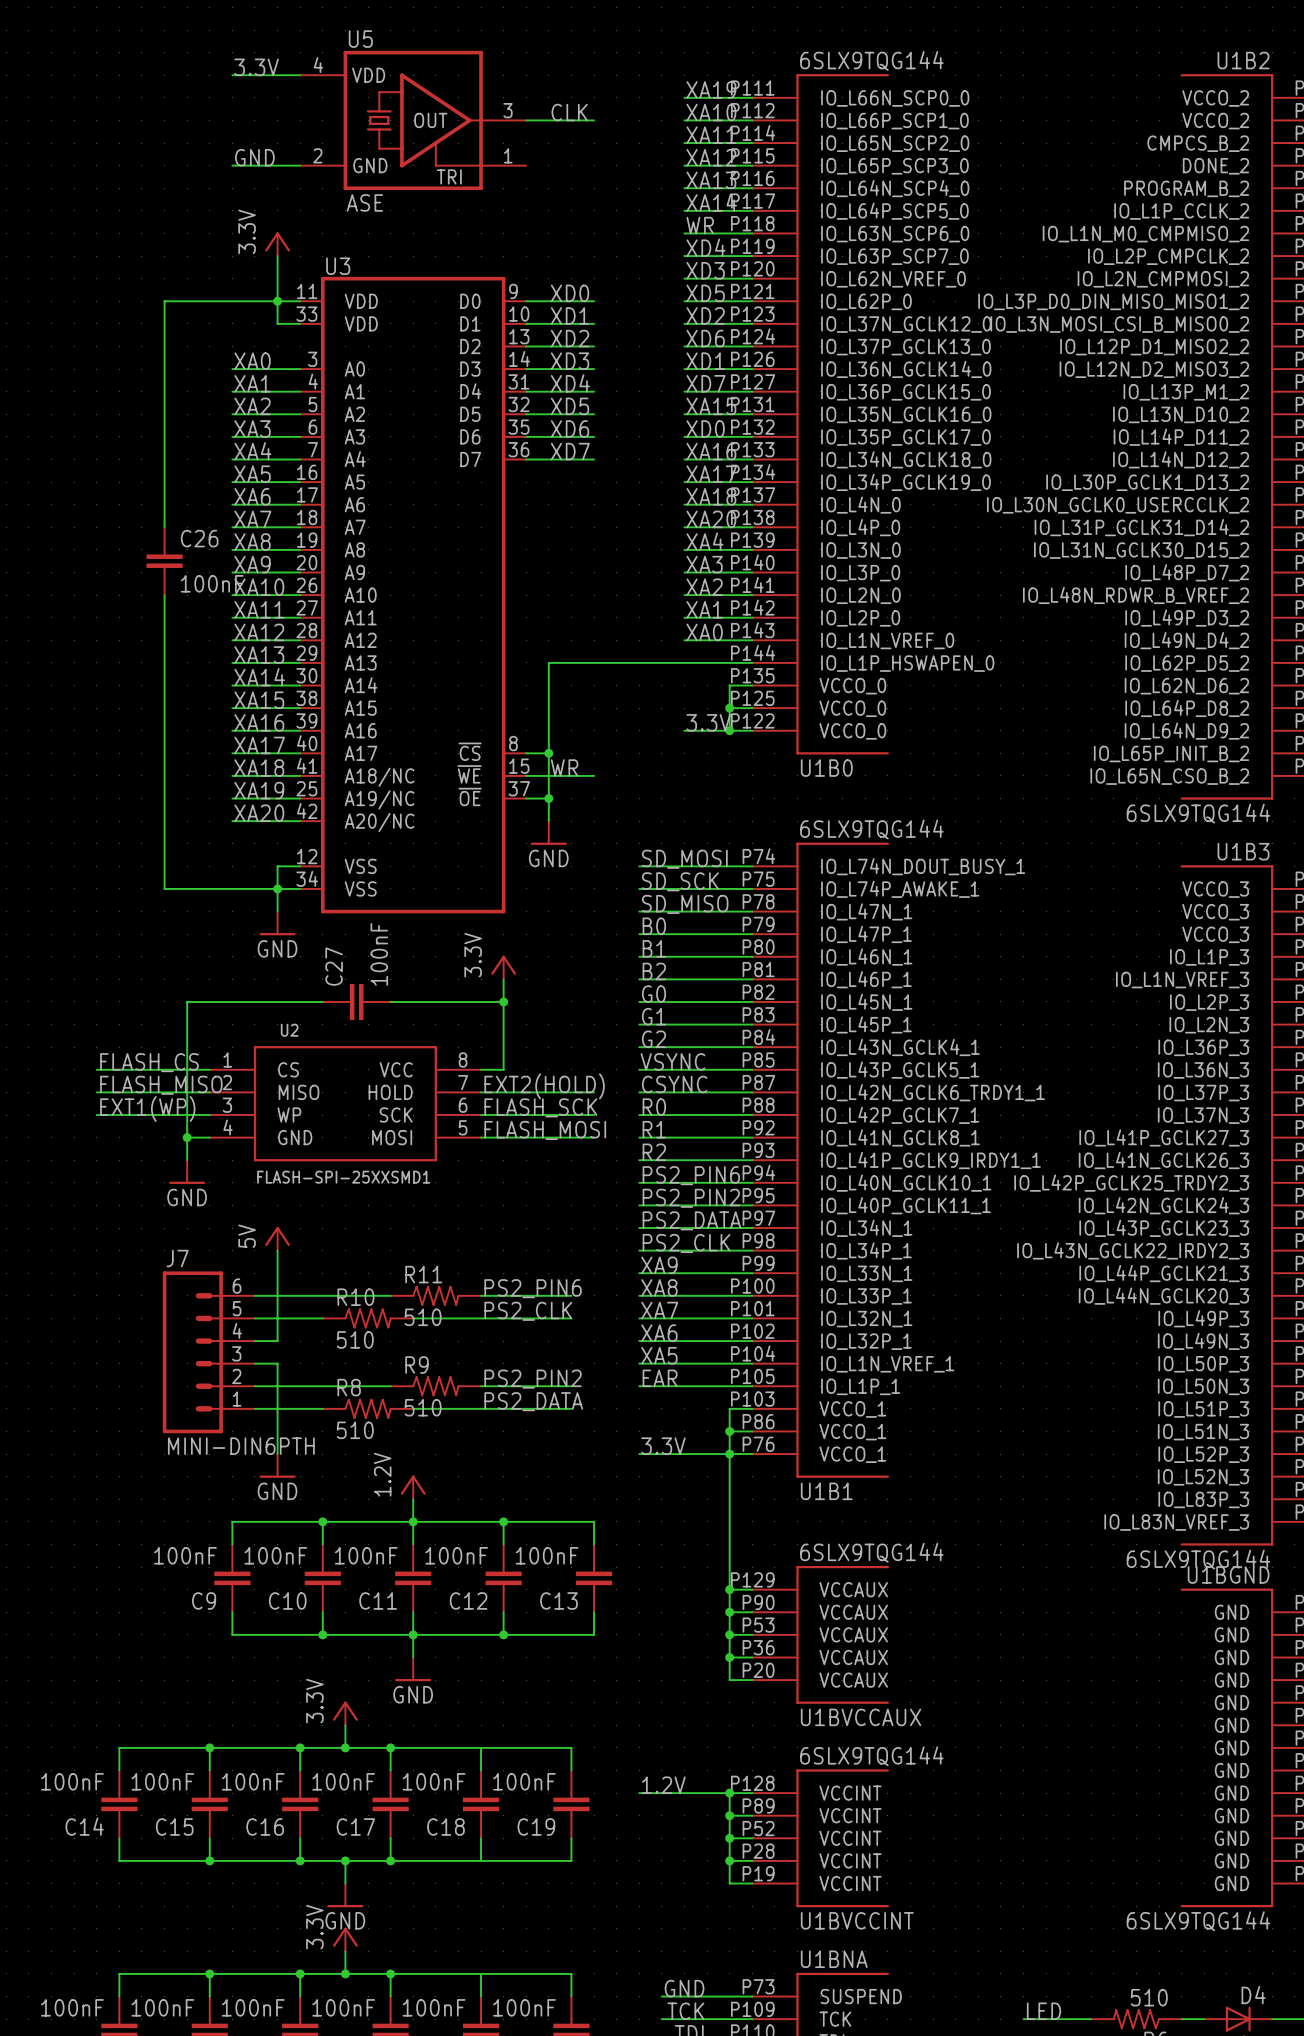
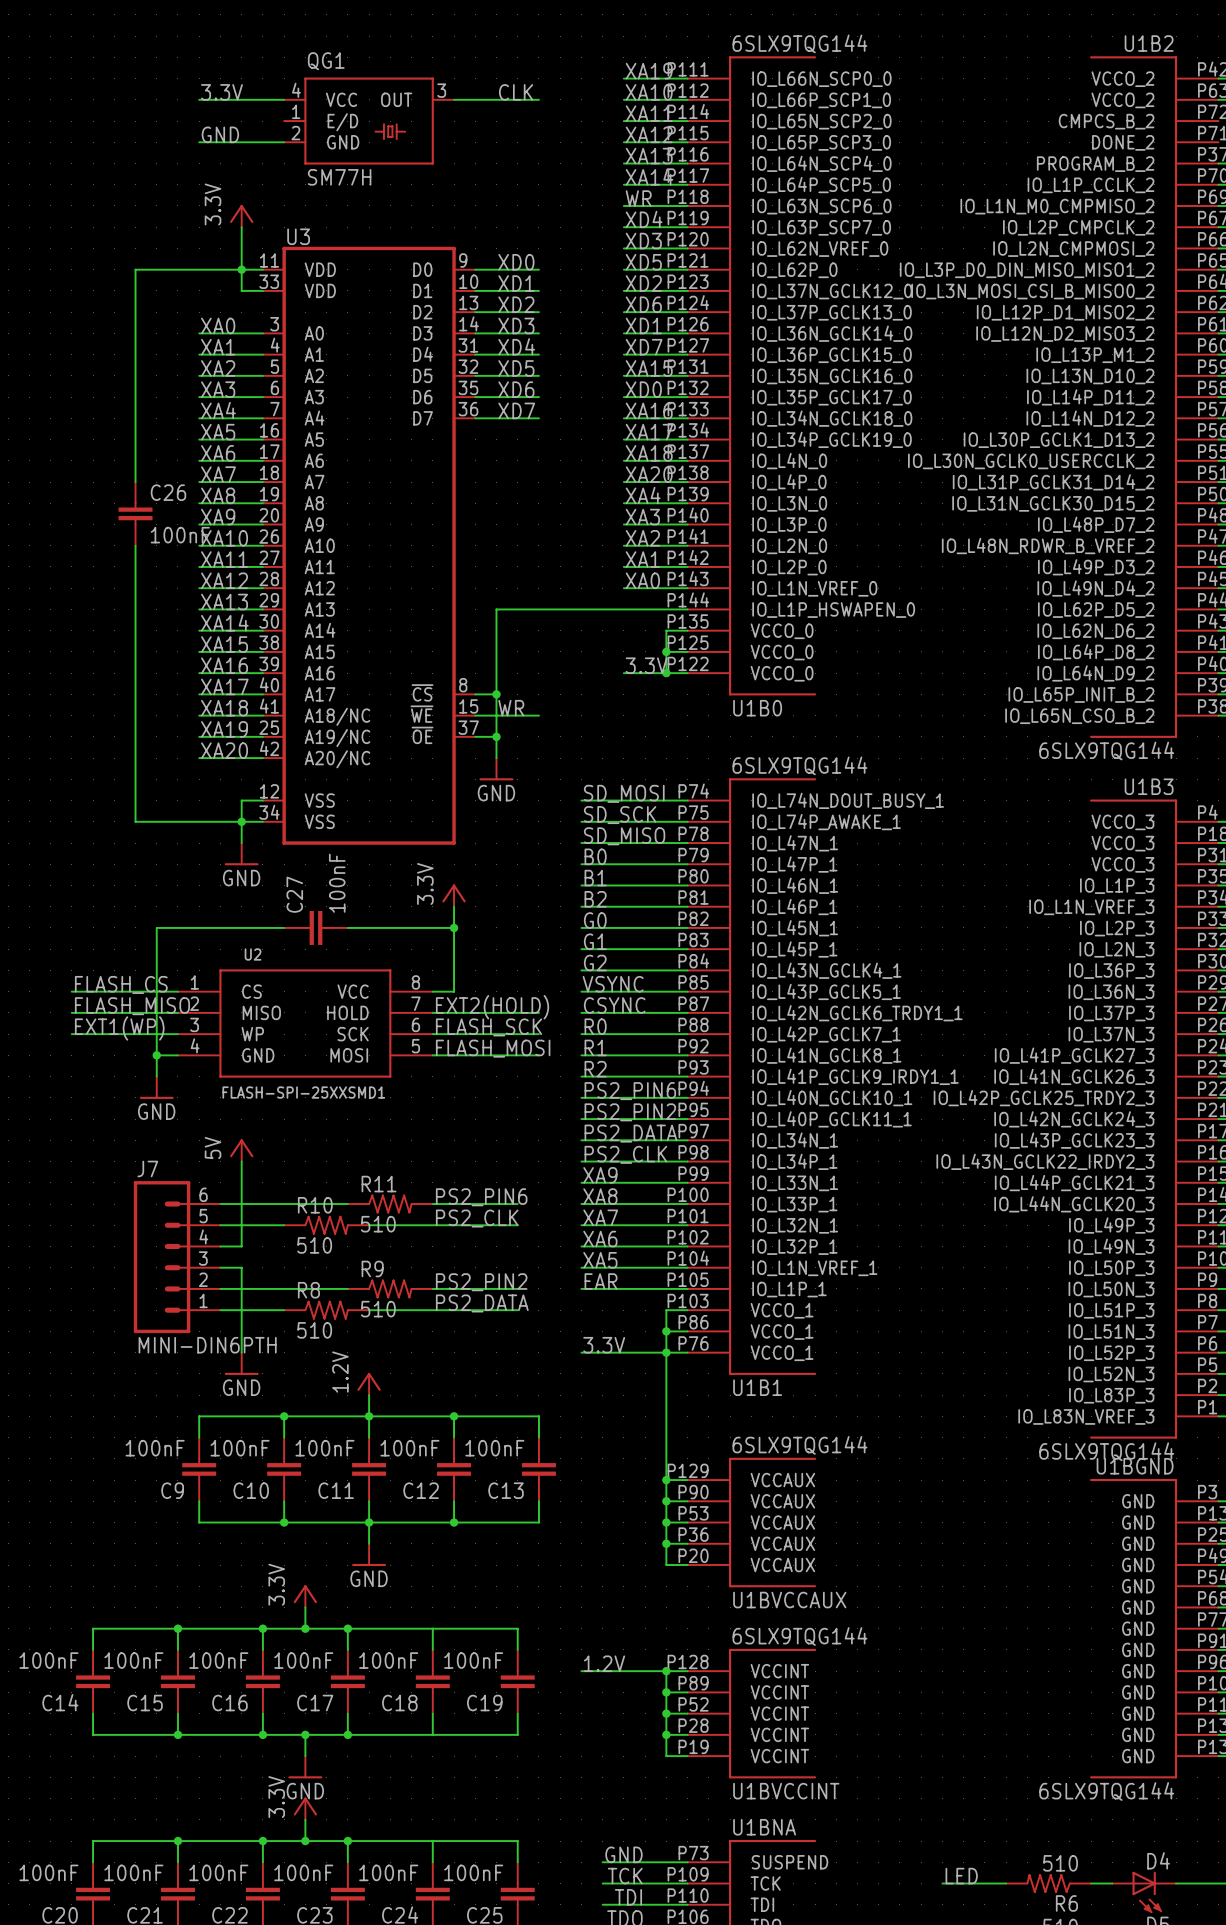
label position: 3.3V (256, 67) -> 3.3V (221, 92)
wire: (232, 75) (300, 75) -> none
wire: none -> (199, 99) (284, 99)
U5: ASE (413, 120) -> none
QG1: none -> SM77H (369, 121)

